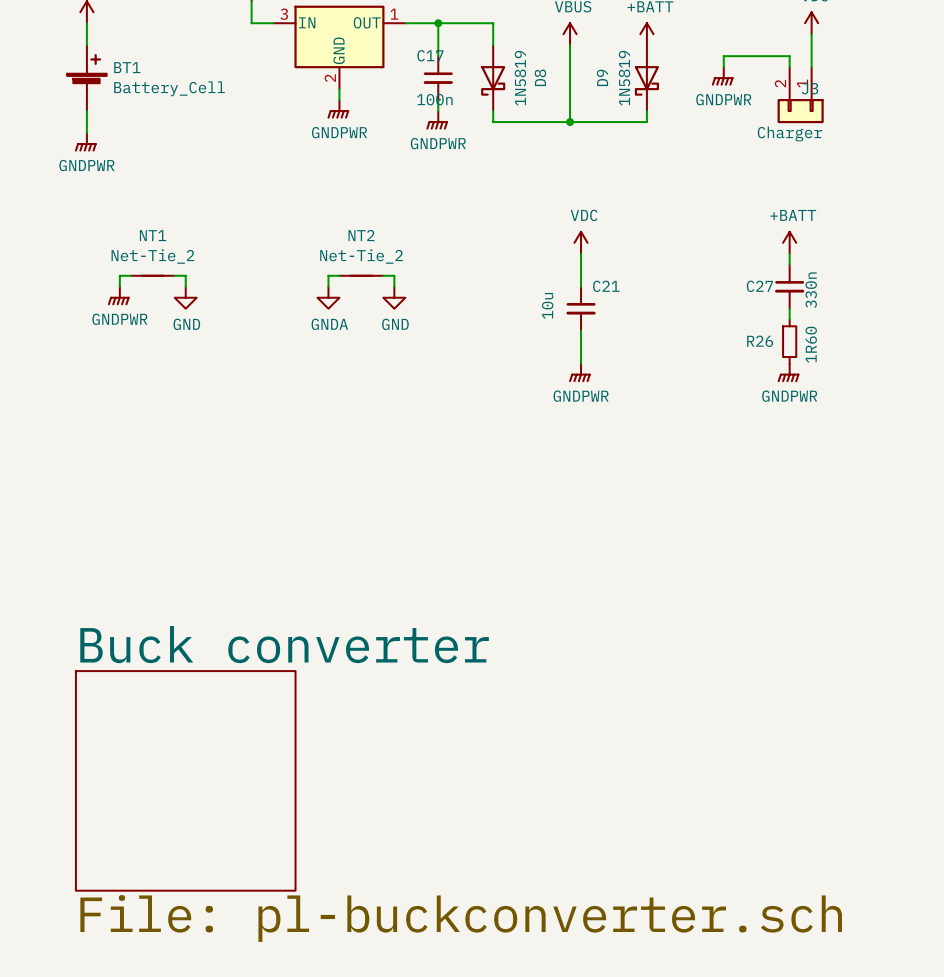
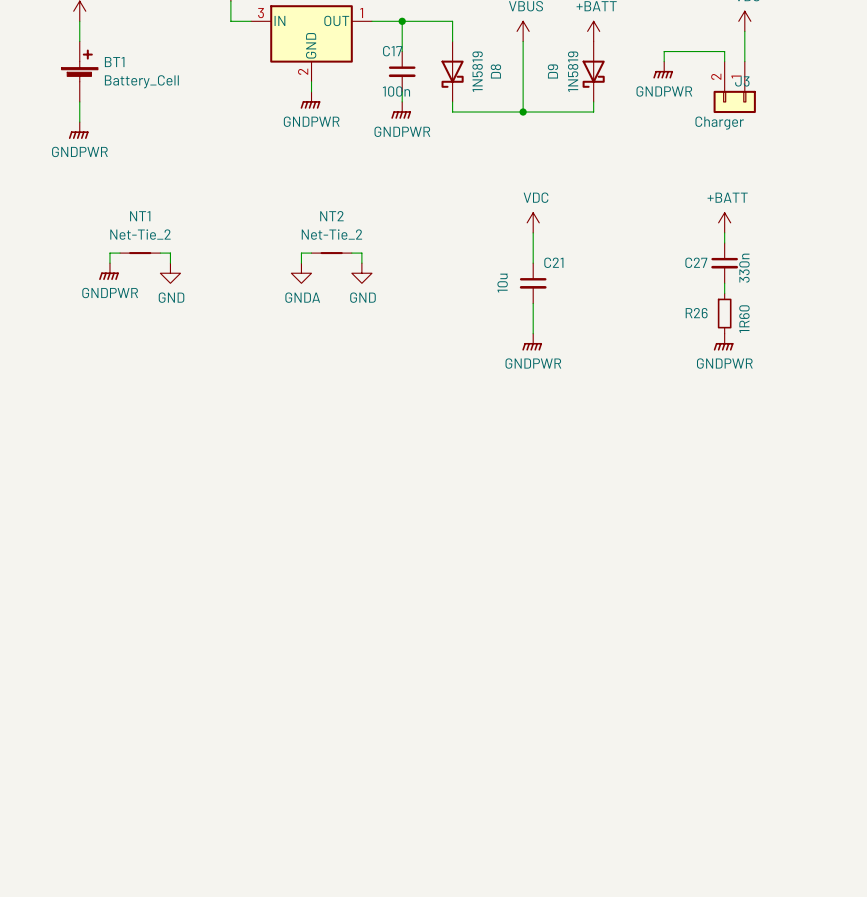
sheet Buck converter: File: pl-buckconverter.sch (185, 780) -> none

